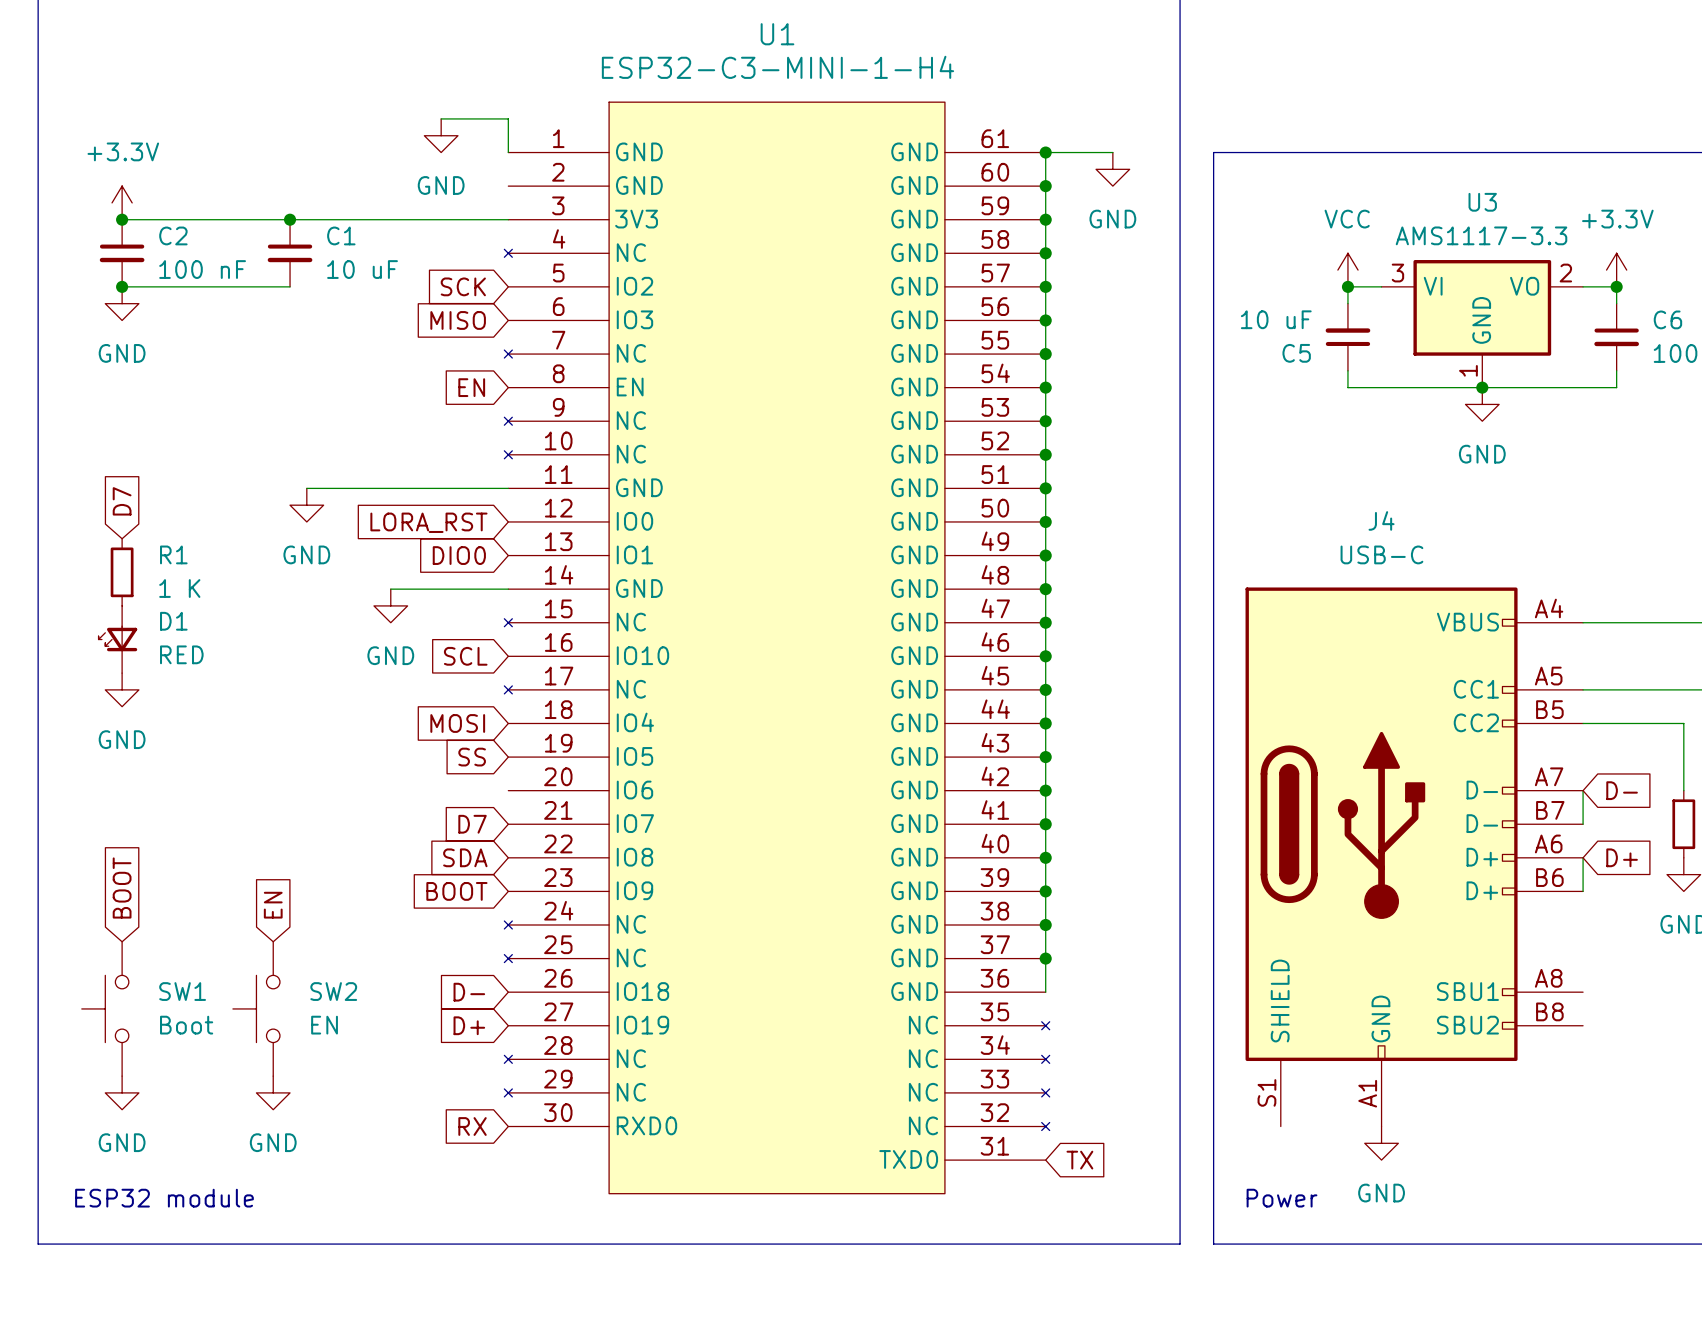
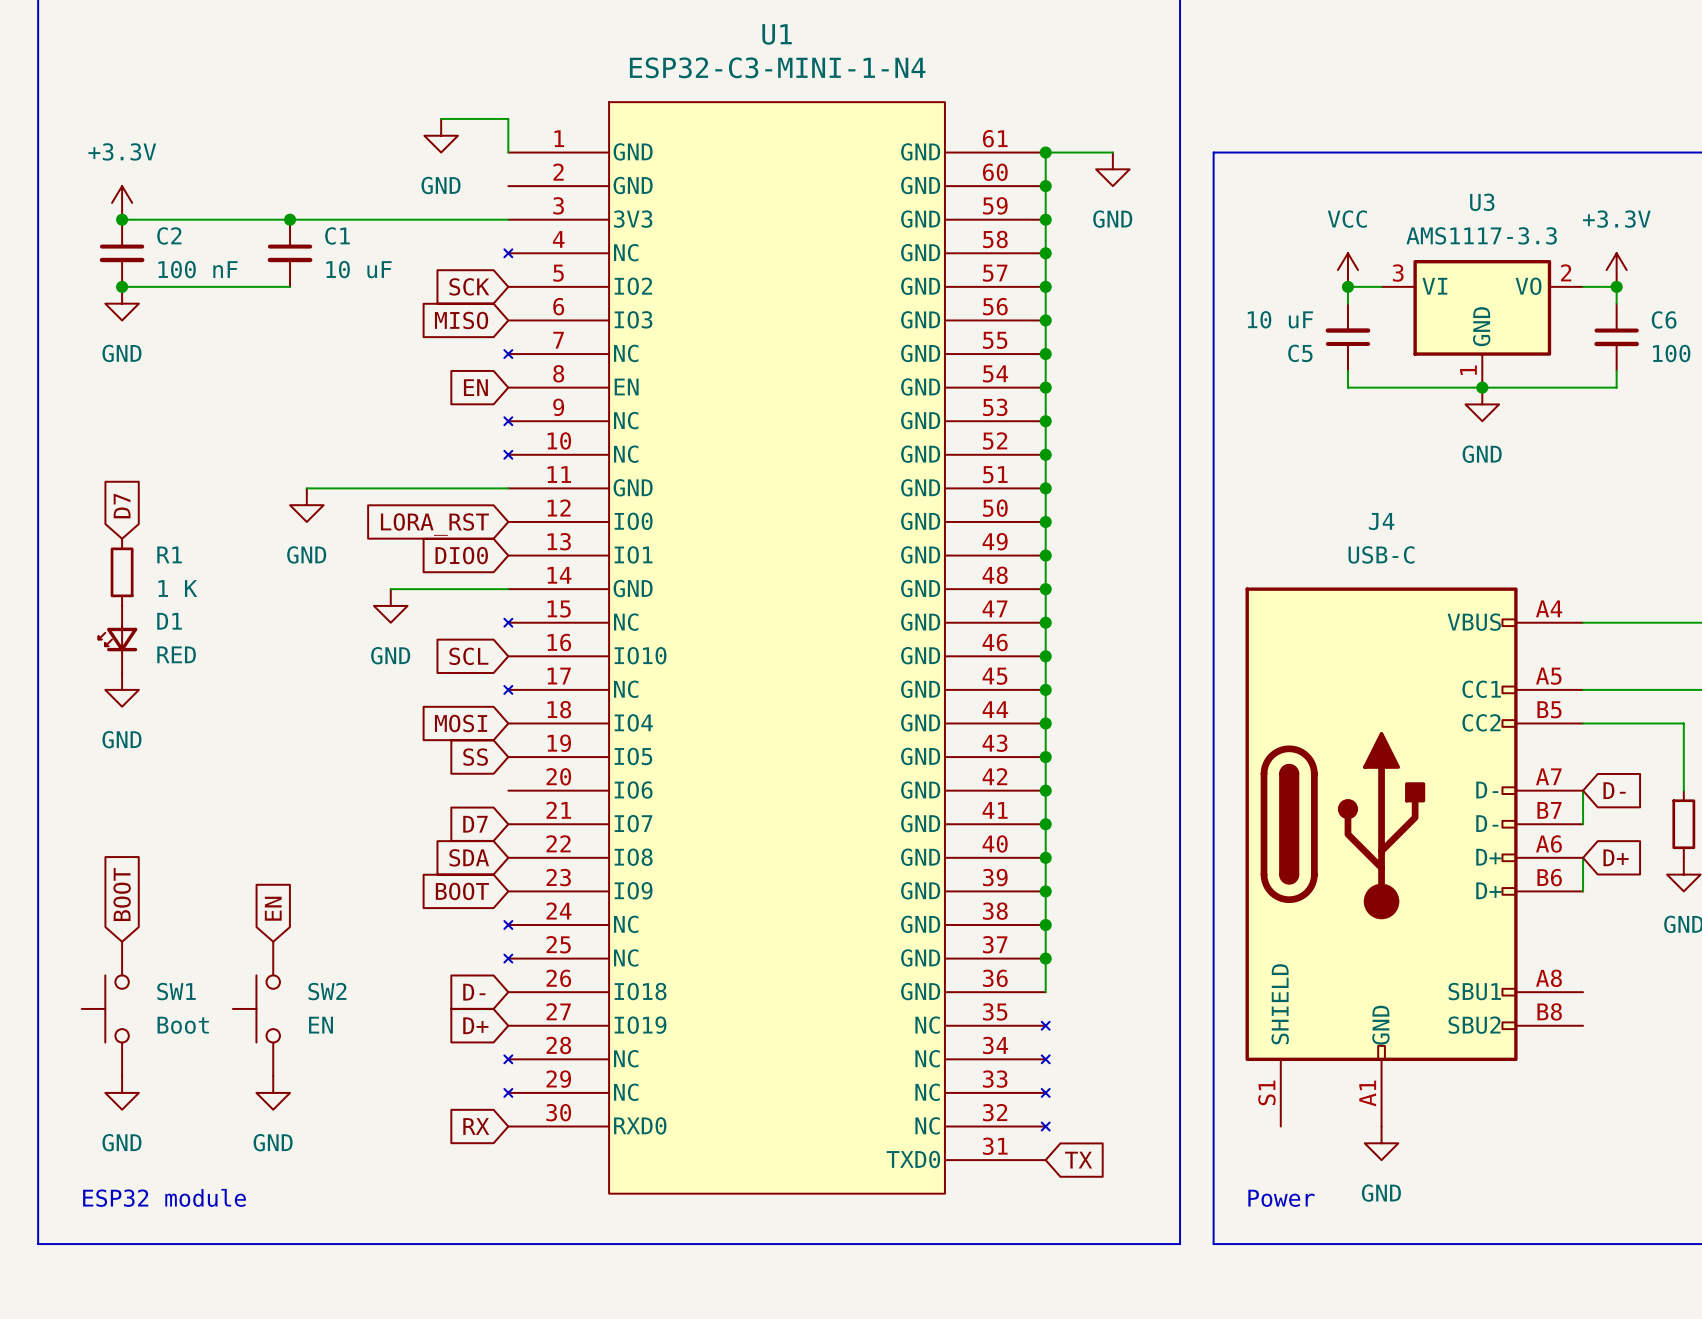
U1 value: ESP32-C3-MINI-1-H4 (777, 67) -> ESP32-C3-MINI-1-N4 (777, 67)

